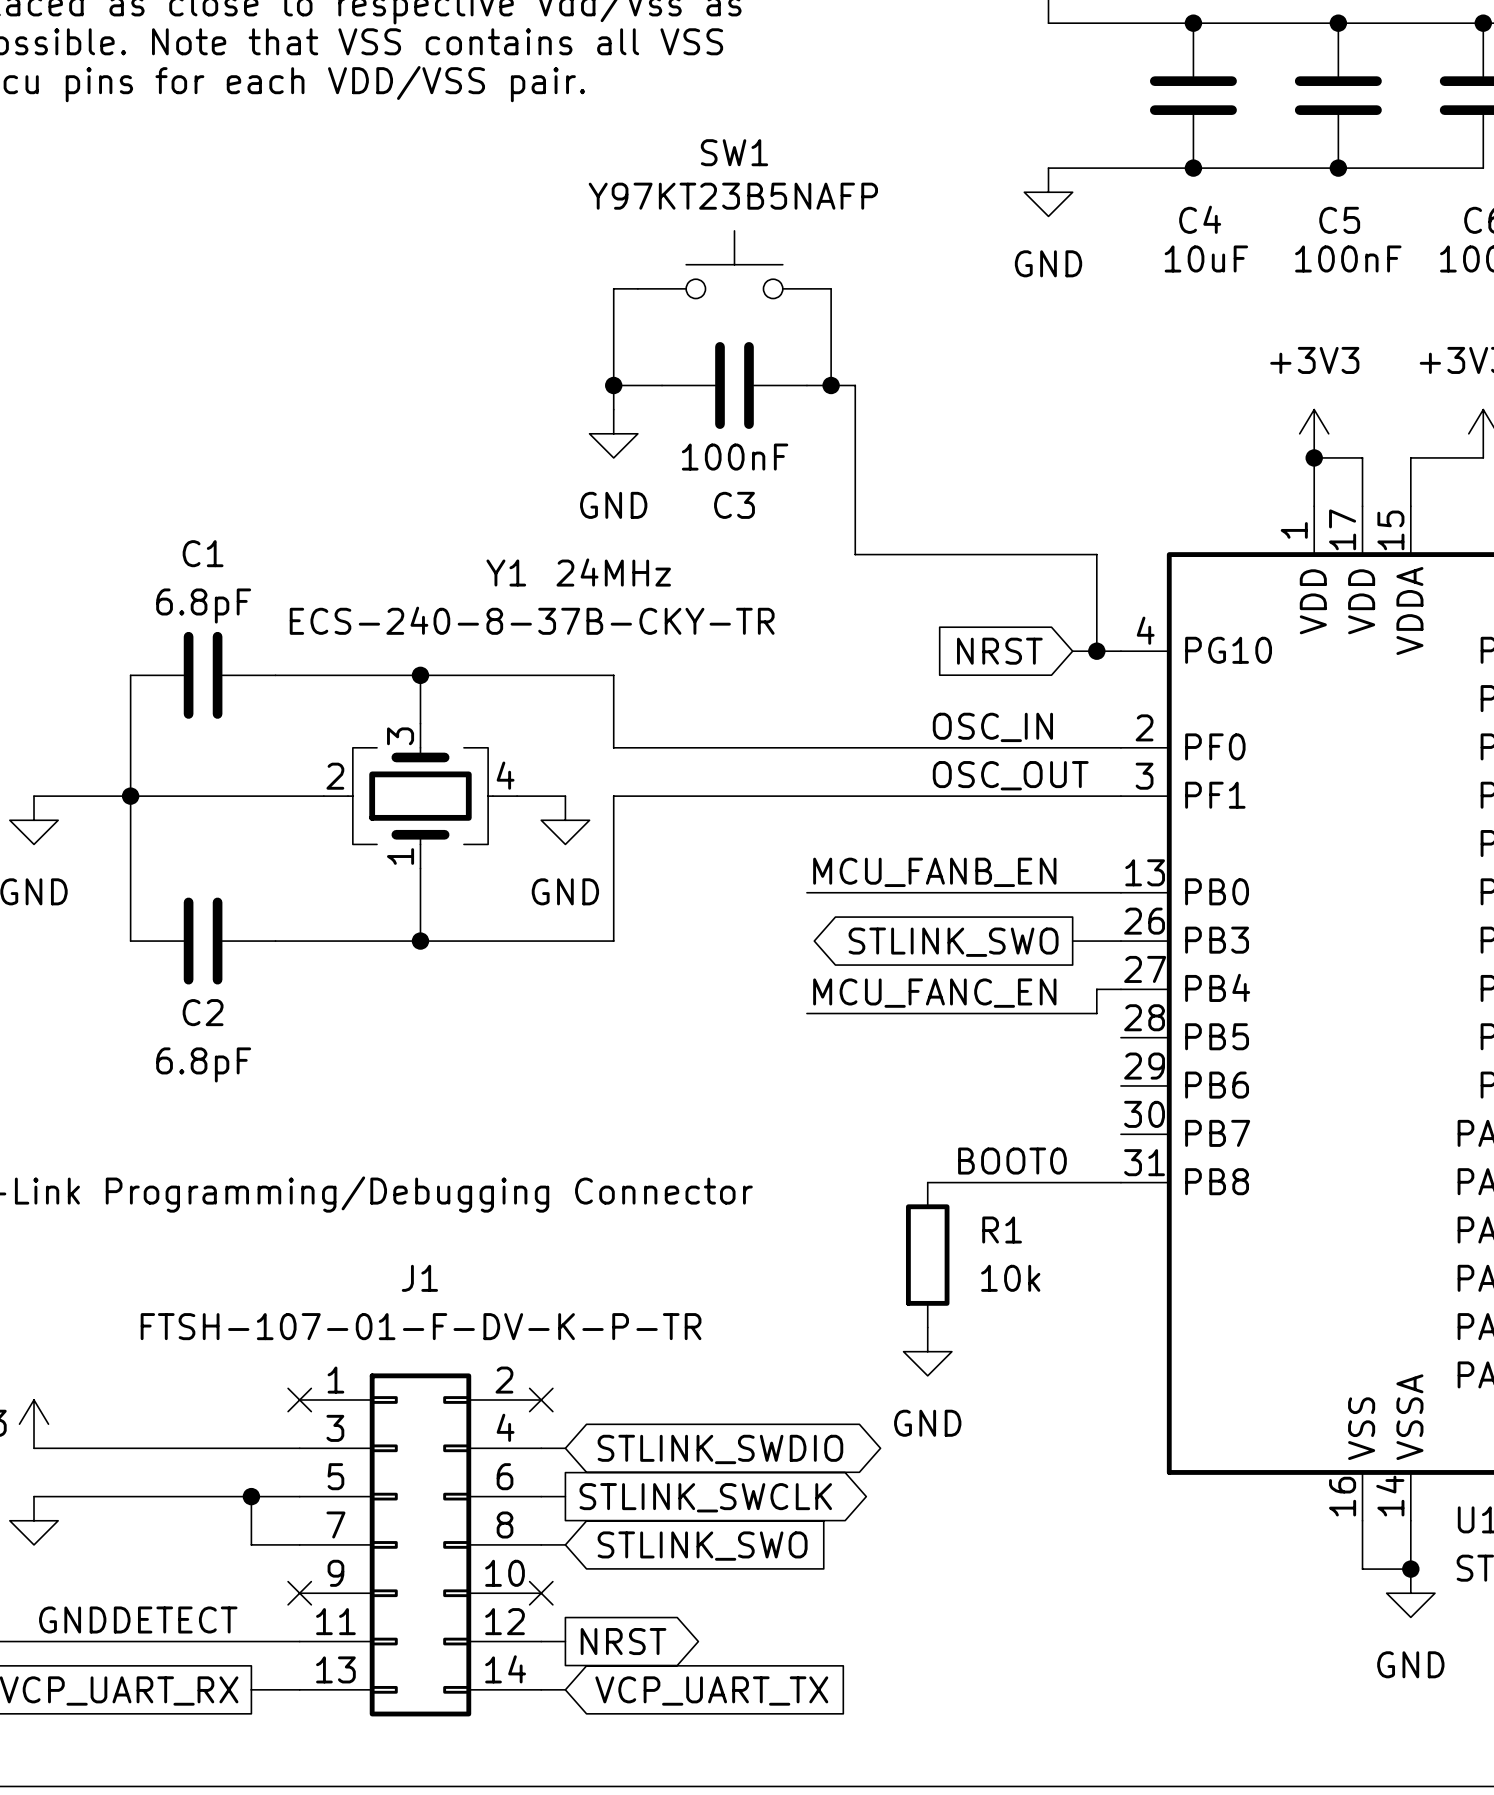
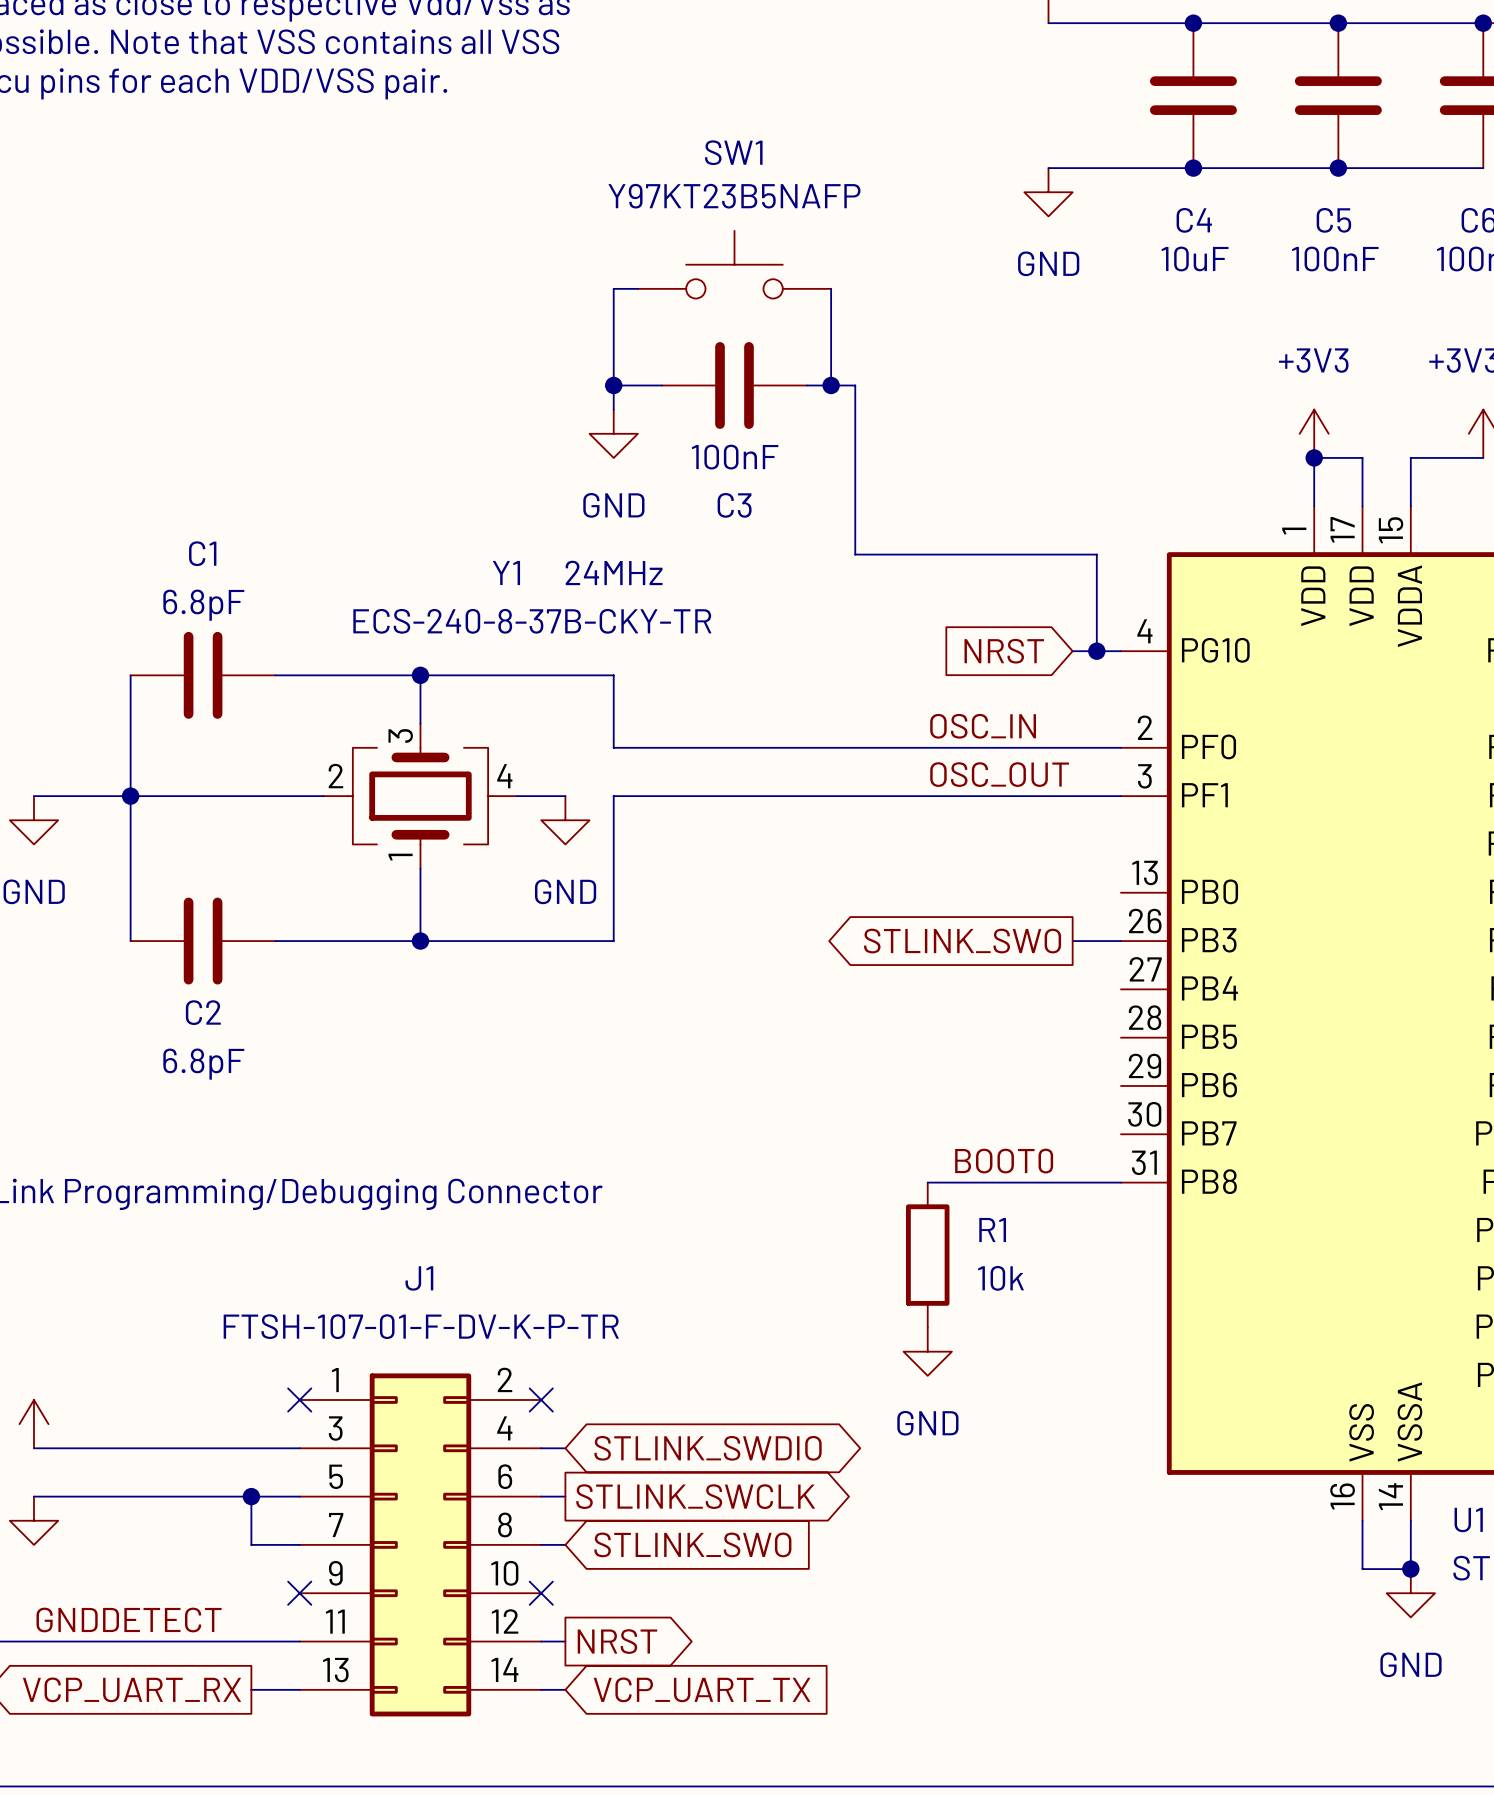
label: MCU_FANB_EN (934, 872) -> none
wire: (806, 892) (1120, 892) -> none
wire: (1120, 989) (1096, 989) (1096, 1013) (806, 1013) -> none
label: MCU_FANC_EN (934, 993) -> none

